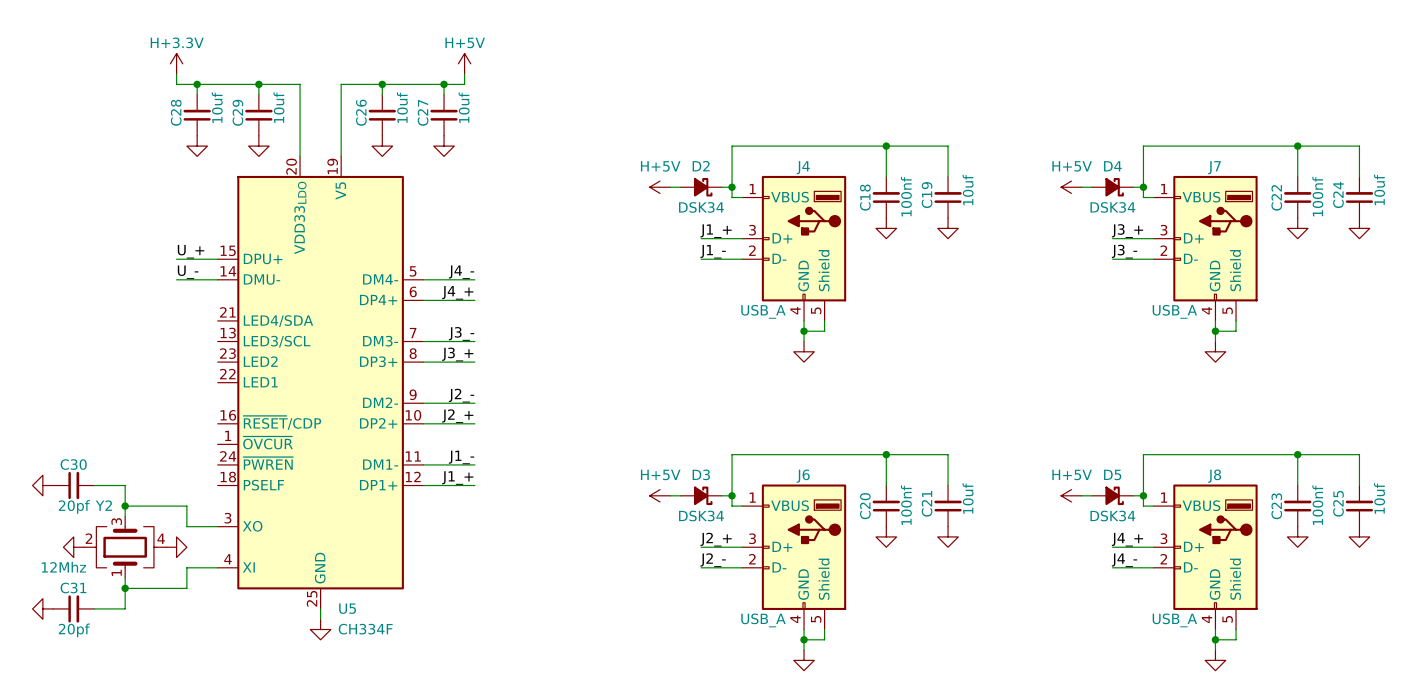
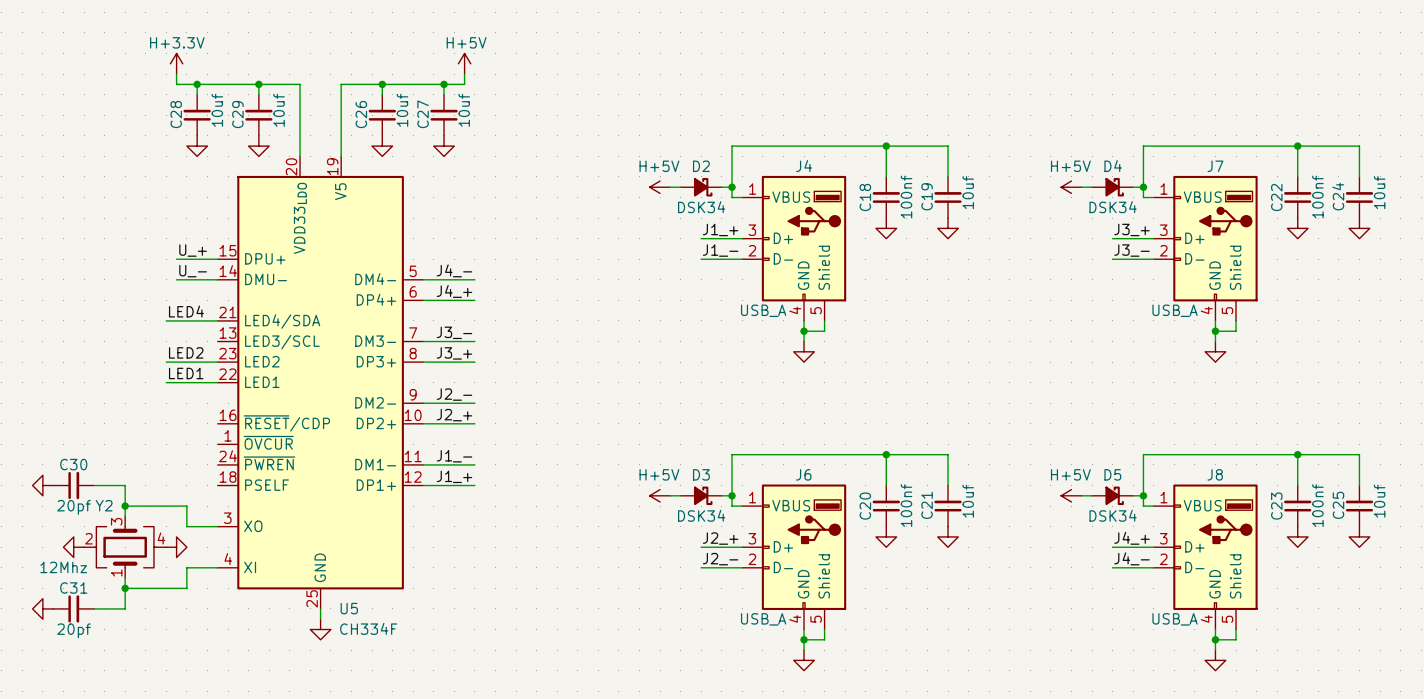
label: none -> LED4 (186, 311)
wire: none -> (166, 320) (217, 320)
label: none -> LED2 (186, 352)
wire: none -> (166, 362) (217, 362)
label: none -> LED1 (186, 373)
wire: none -> (166, 382) (217, 382)

